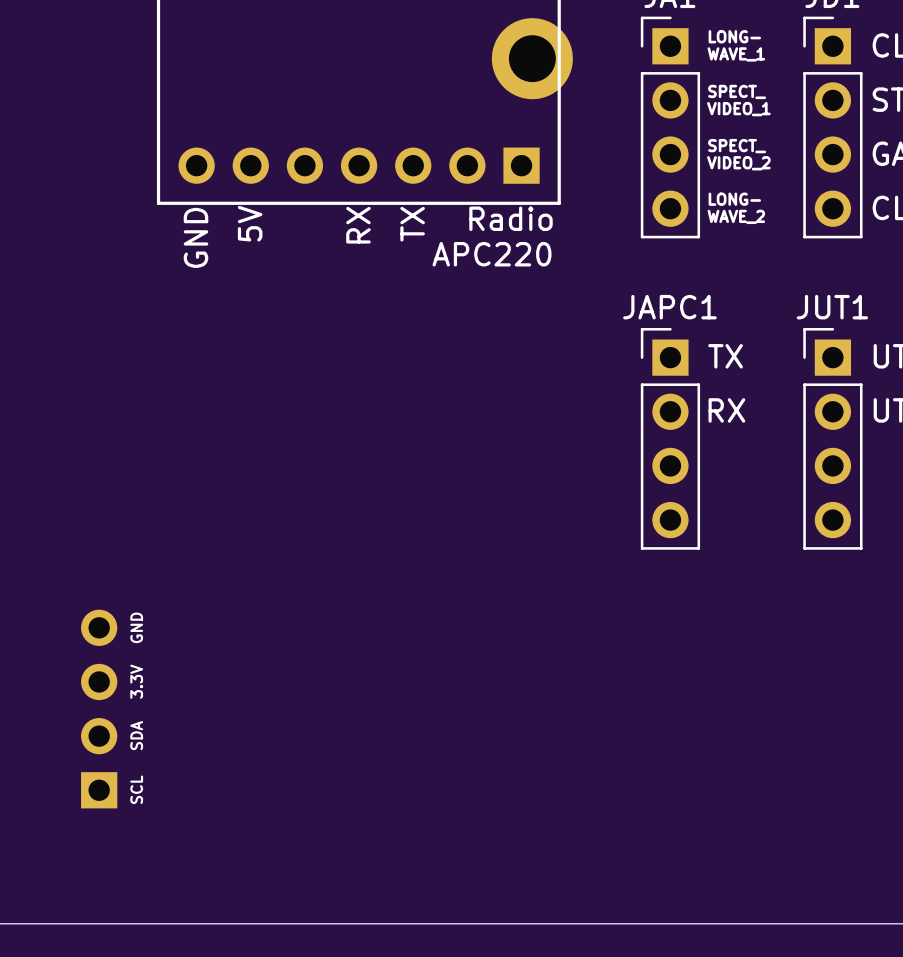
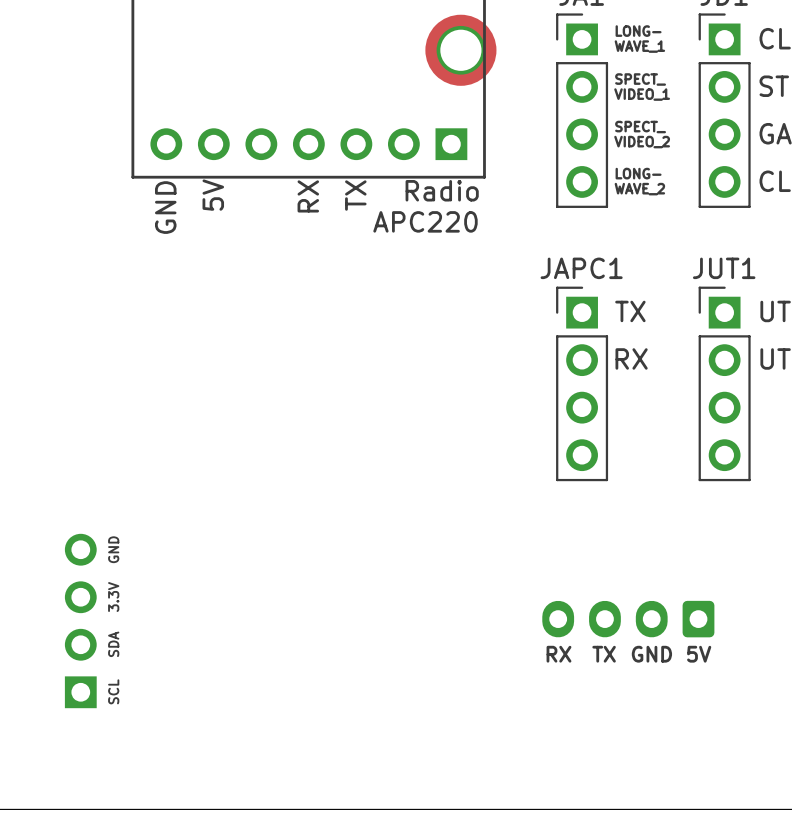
part: none -> (628, 619)
text: none -> RX (558, 654)
text: none -> TX (604, 654)
text: none -> GND (651, 654)
text: none -> 5V (699, 654)

